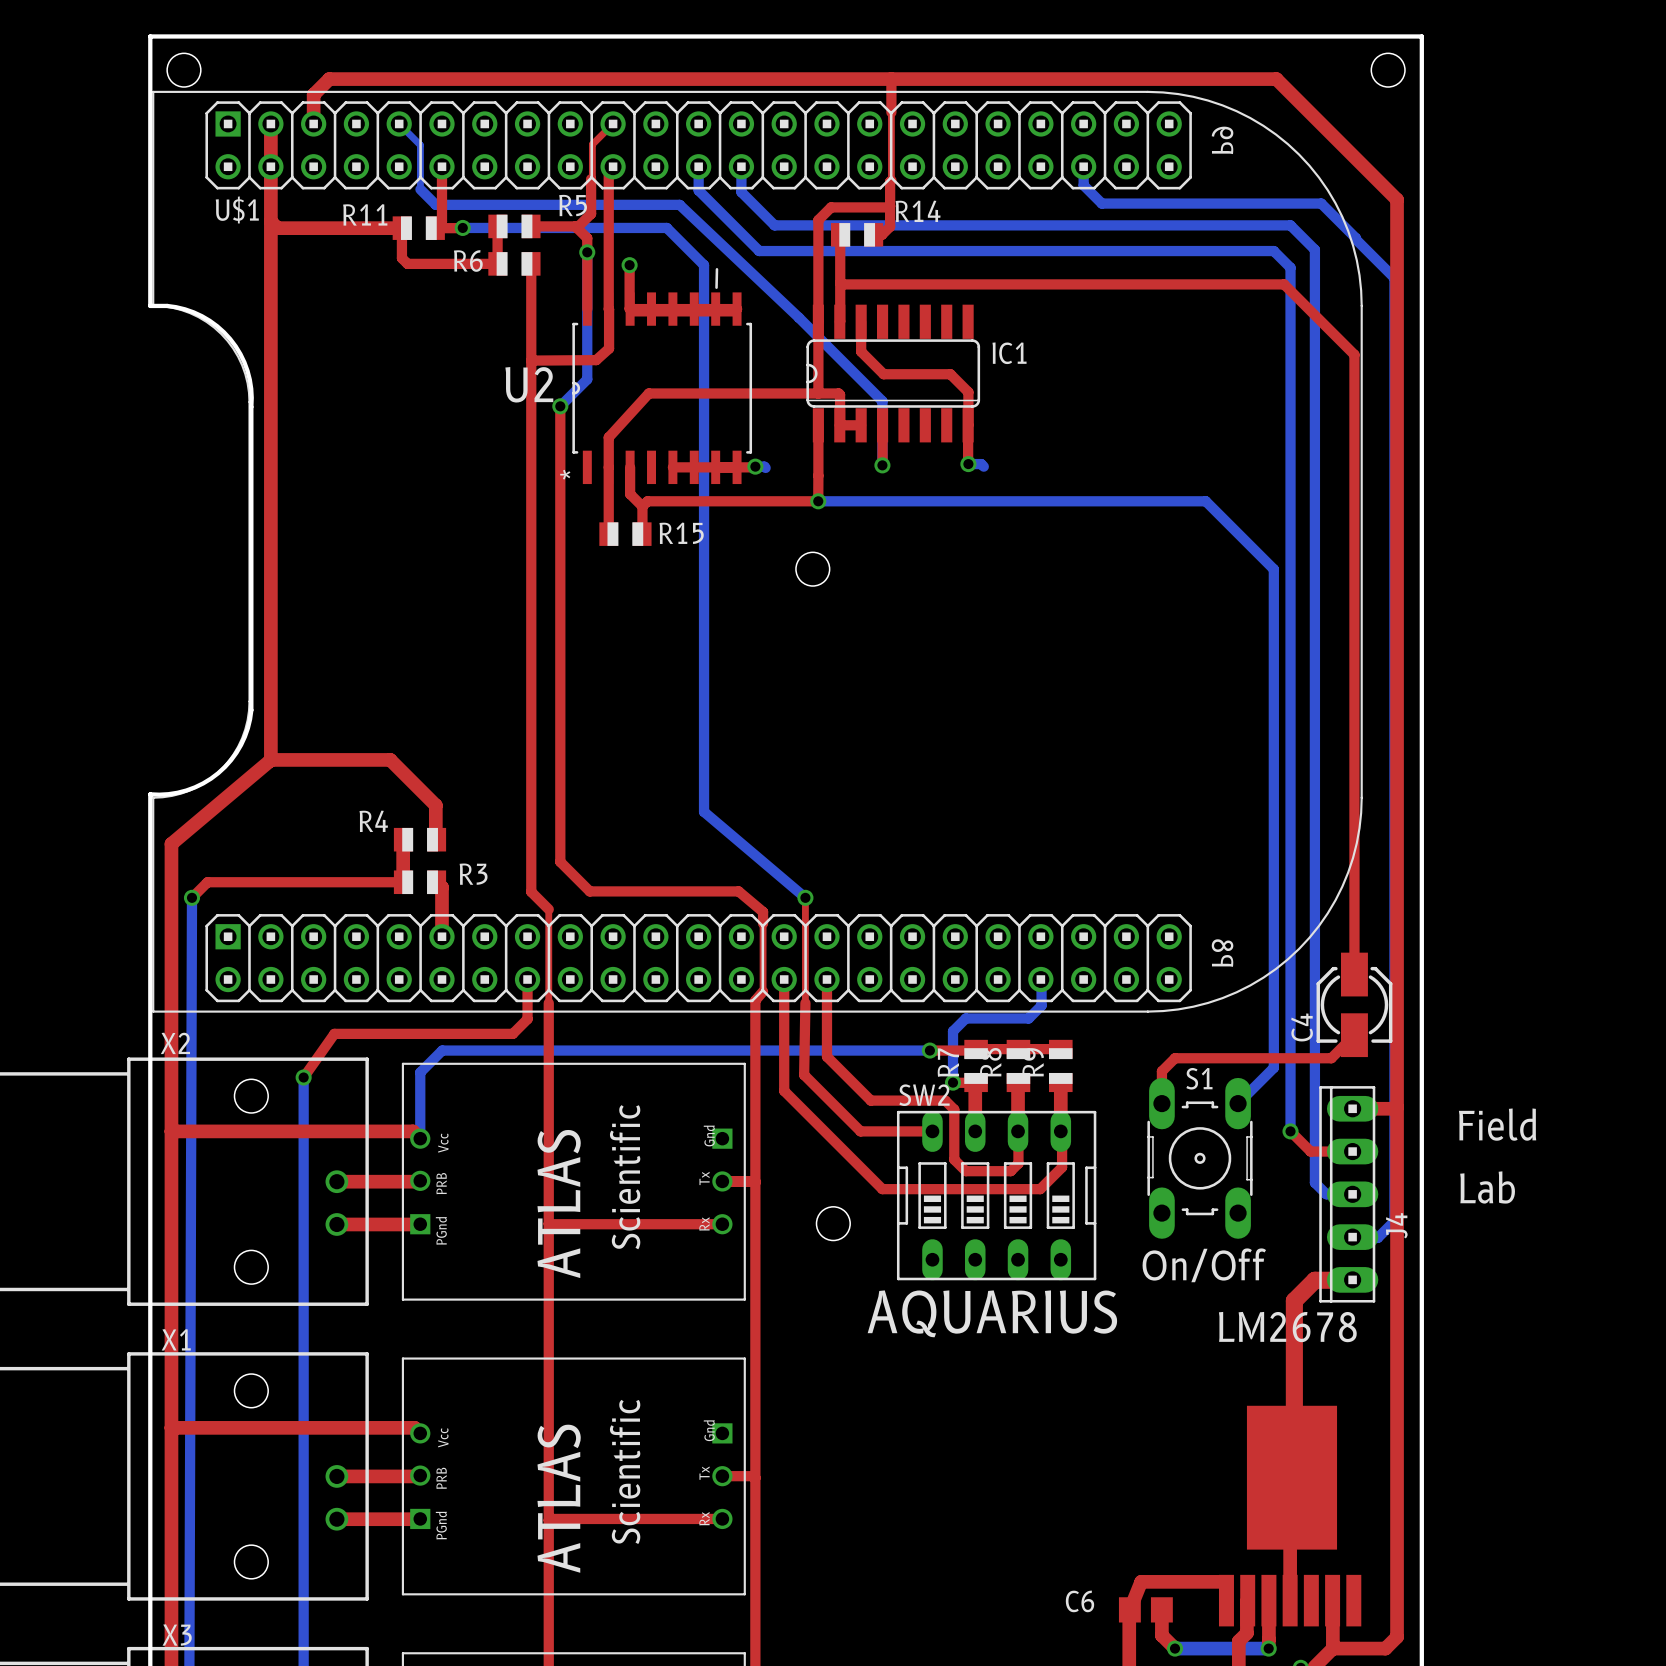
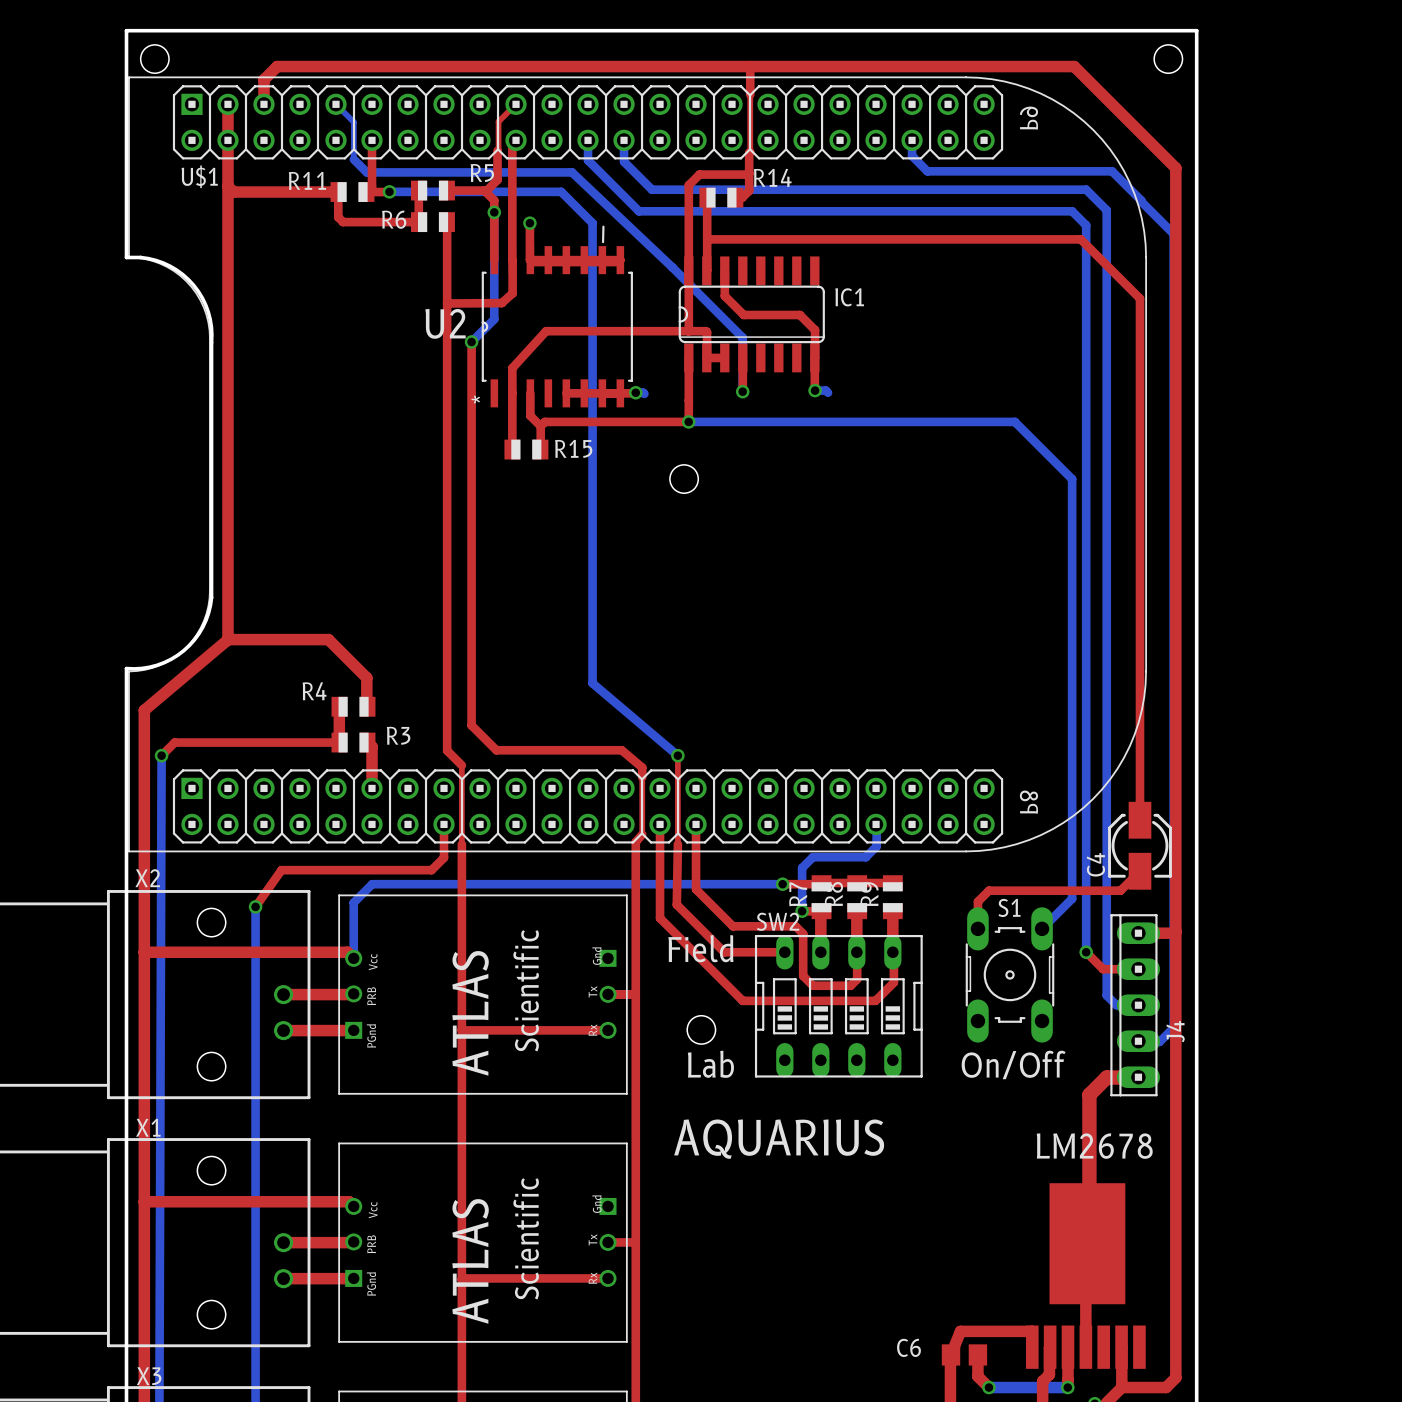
text: Field (1497, 1124) -> none
text: none -> Field (700, 948)
text: Lab (1487, 1187) -> none
text: none -> Lab (710, 1064)
text position: AQUARIUS (992, 1313) -> AQUARIUS (779, 1139)
text position: LM2678 (1287, 1327) -> LM2678 (1094, 1146)

